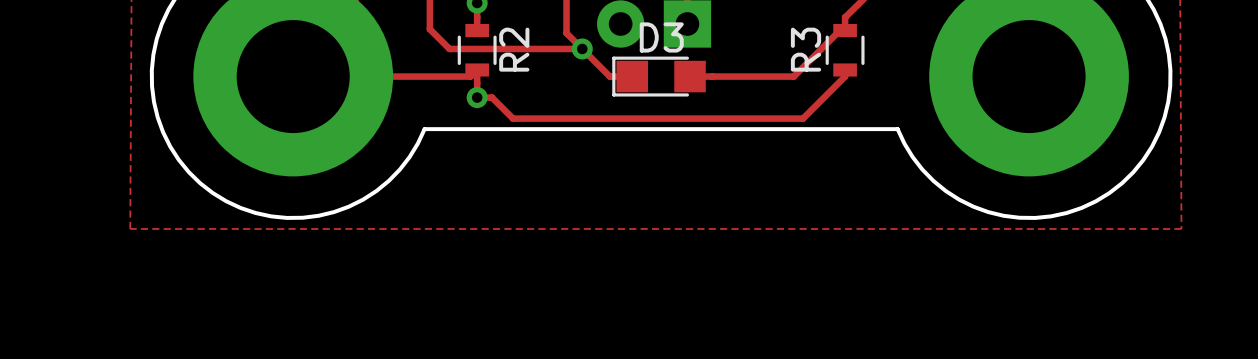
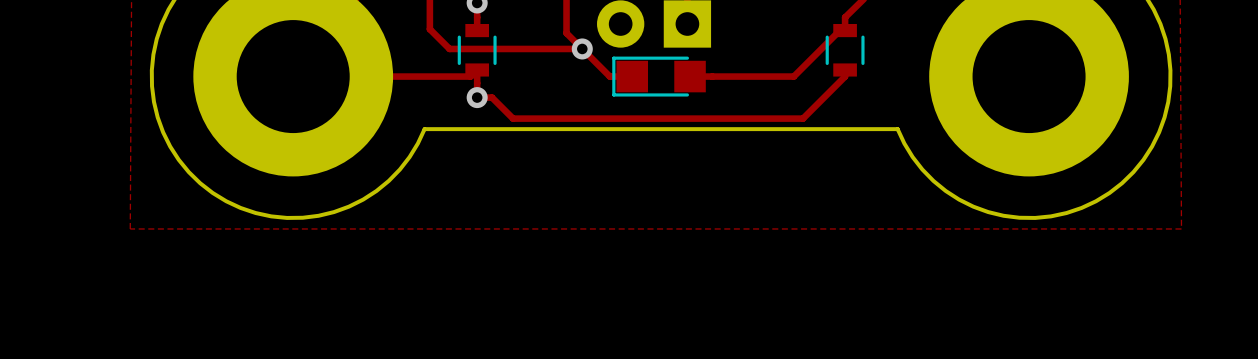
D3 name: D3 (661, 37) -> none
R2 name: R2 (514, 49) -> none
R3 name: R3 (806, 49) -> none

